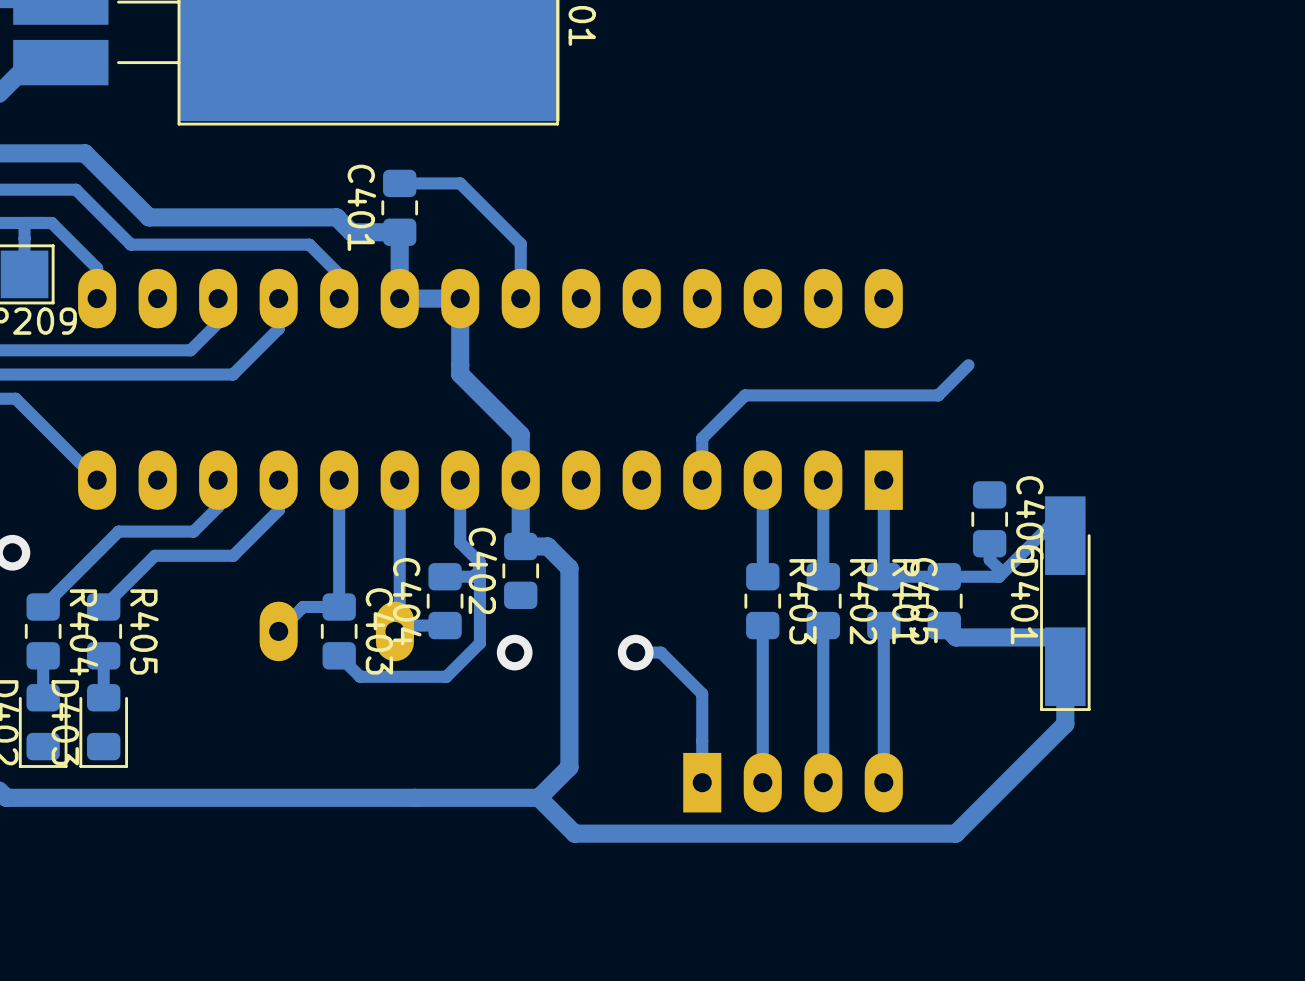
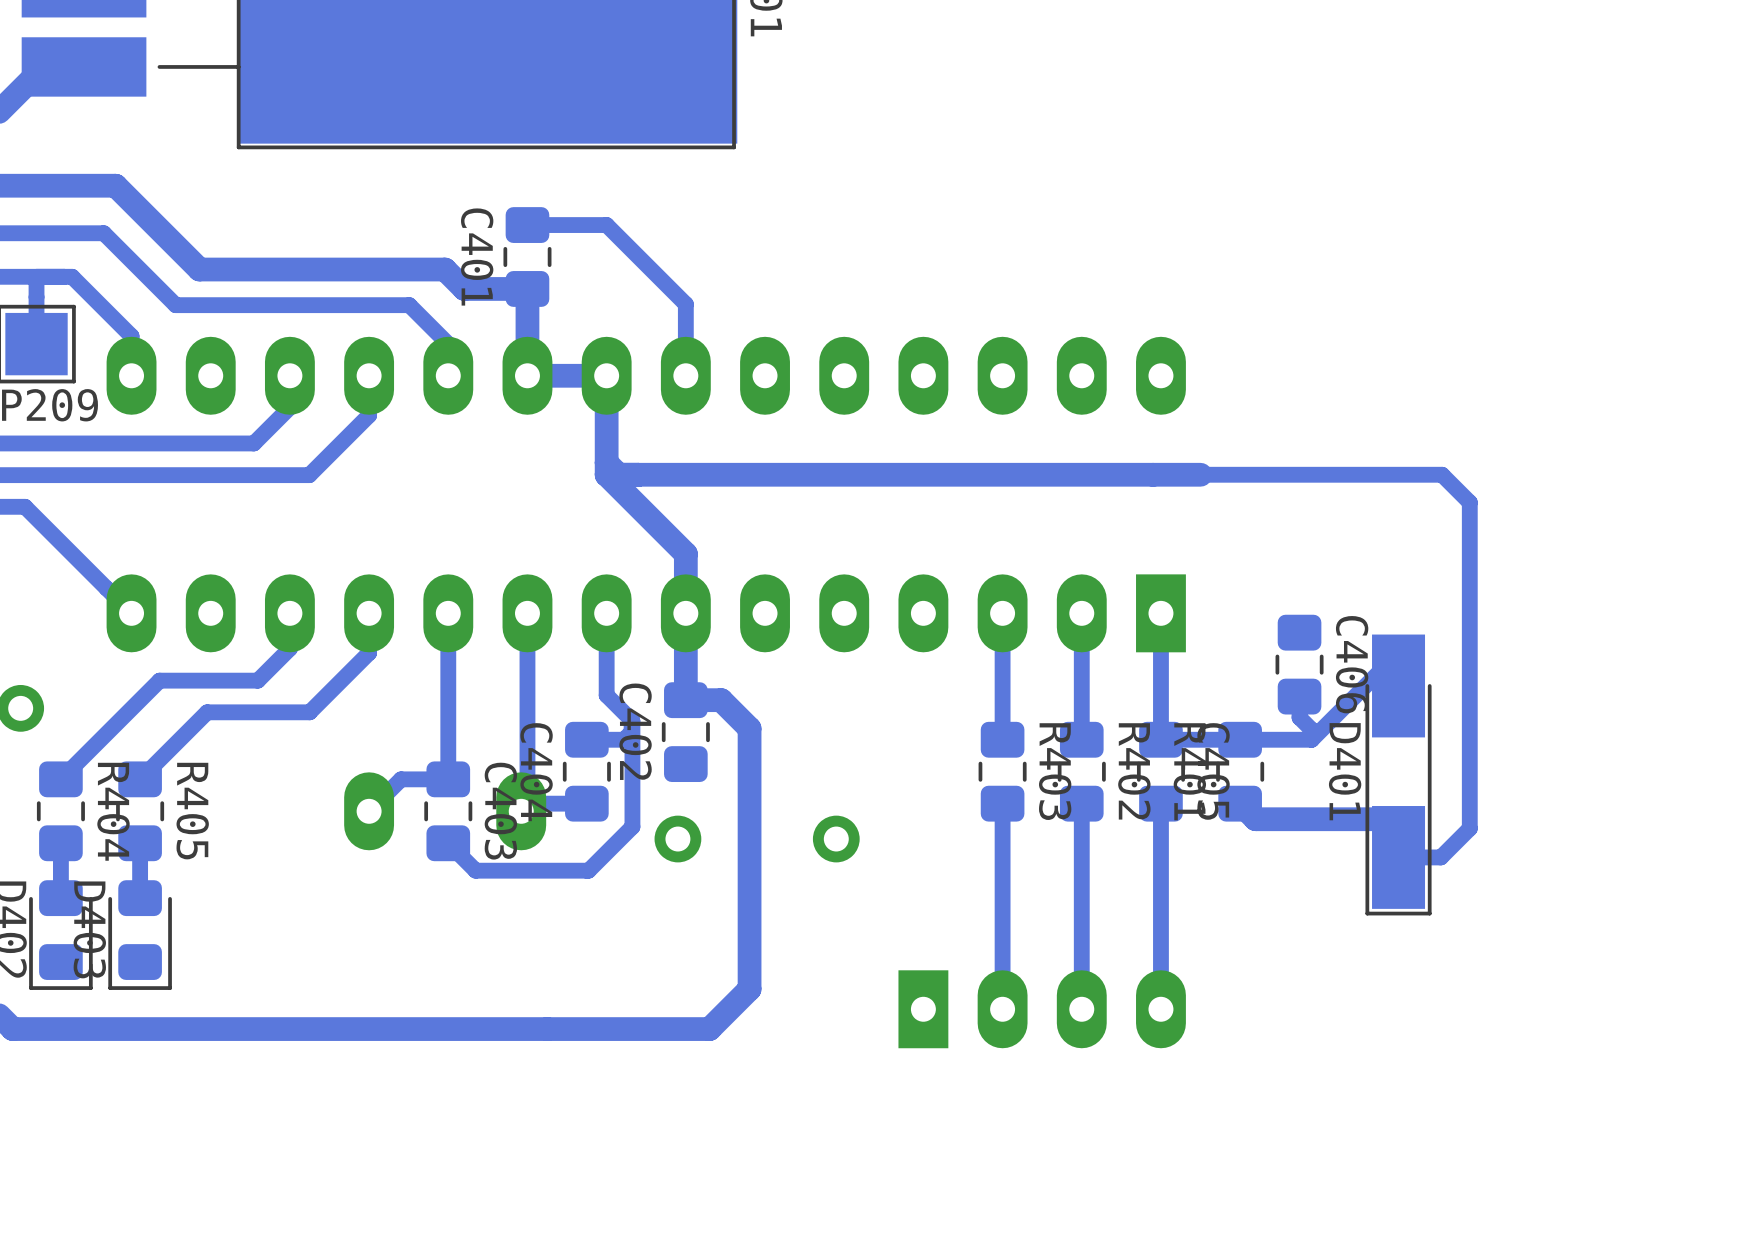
track: (968, 365) (938, 395) (745, 395) (702, 438) (702, 480) -> none
track: none -> (1200, 474) (606, 474)
track: (635, 652) (660, 652) (702, 693) (702, 782) -> none
track: (1065, 666) (1065, 724) (955, 833) (574, 833) (538, 797) -> (1398, 857) (1440, 857) (1469, 828) (1469, 502) (1442, 474) (1153, 474)

